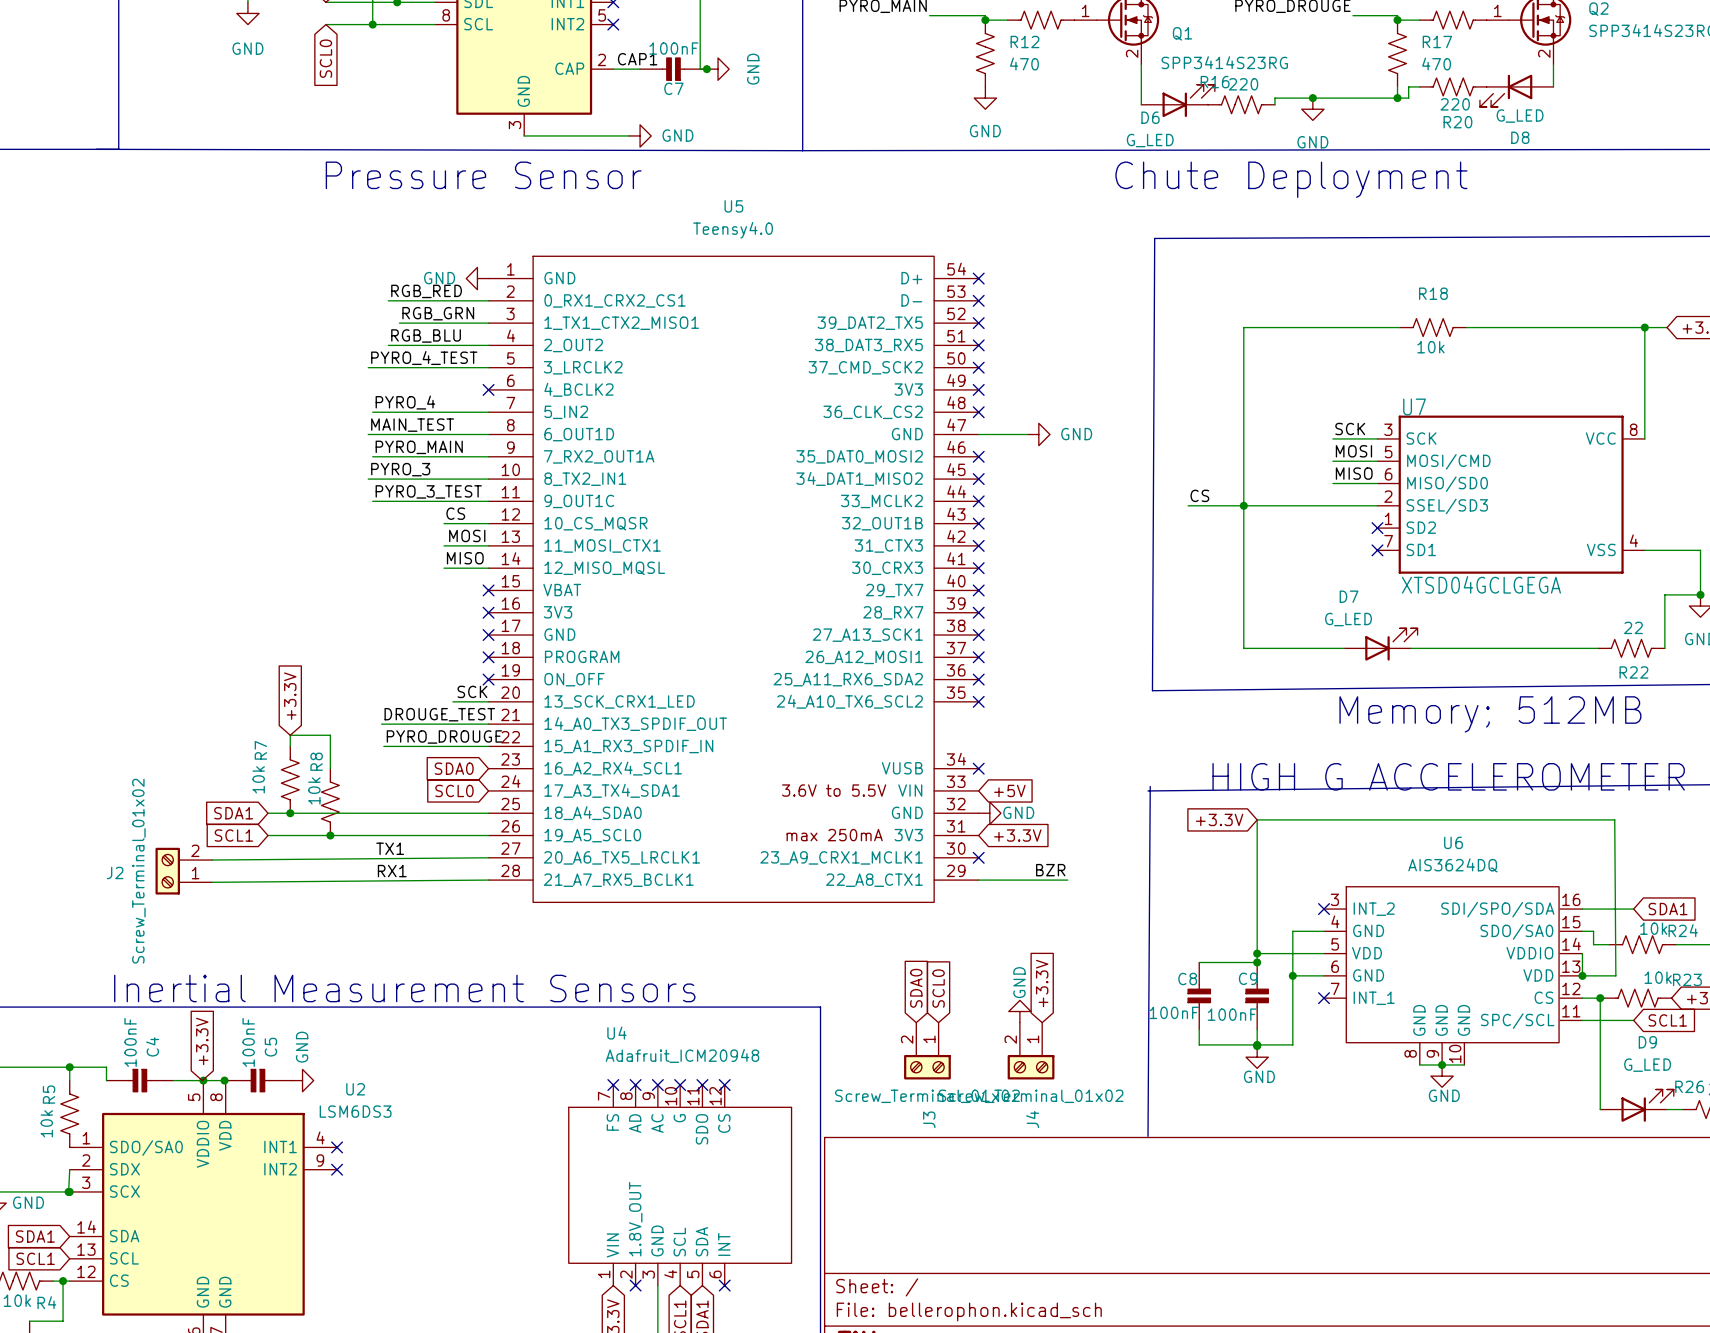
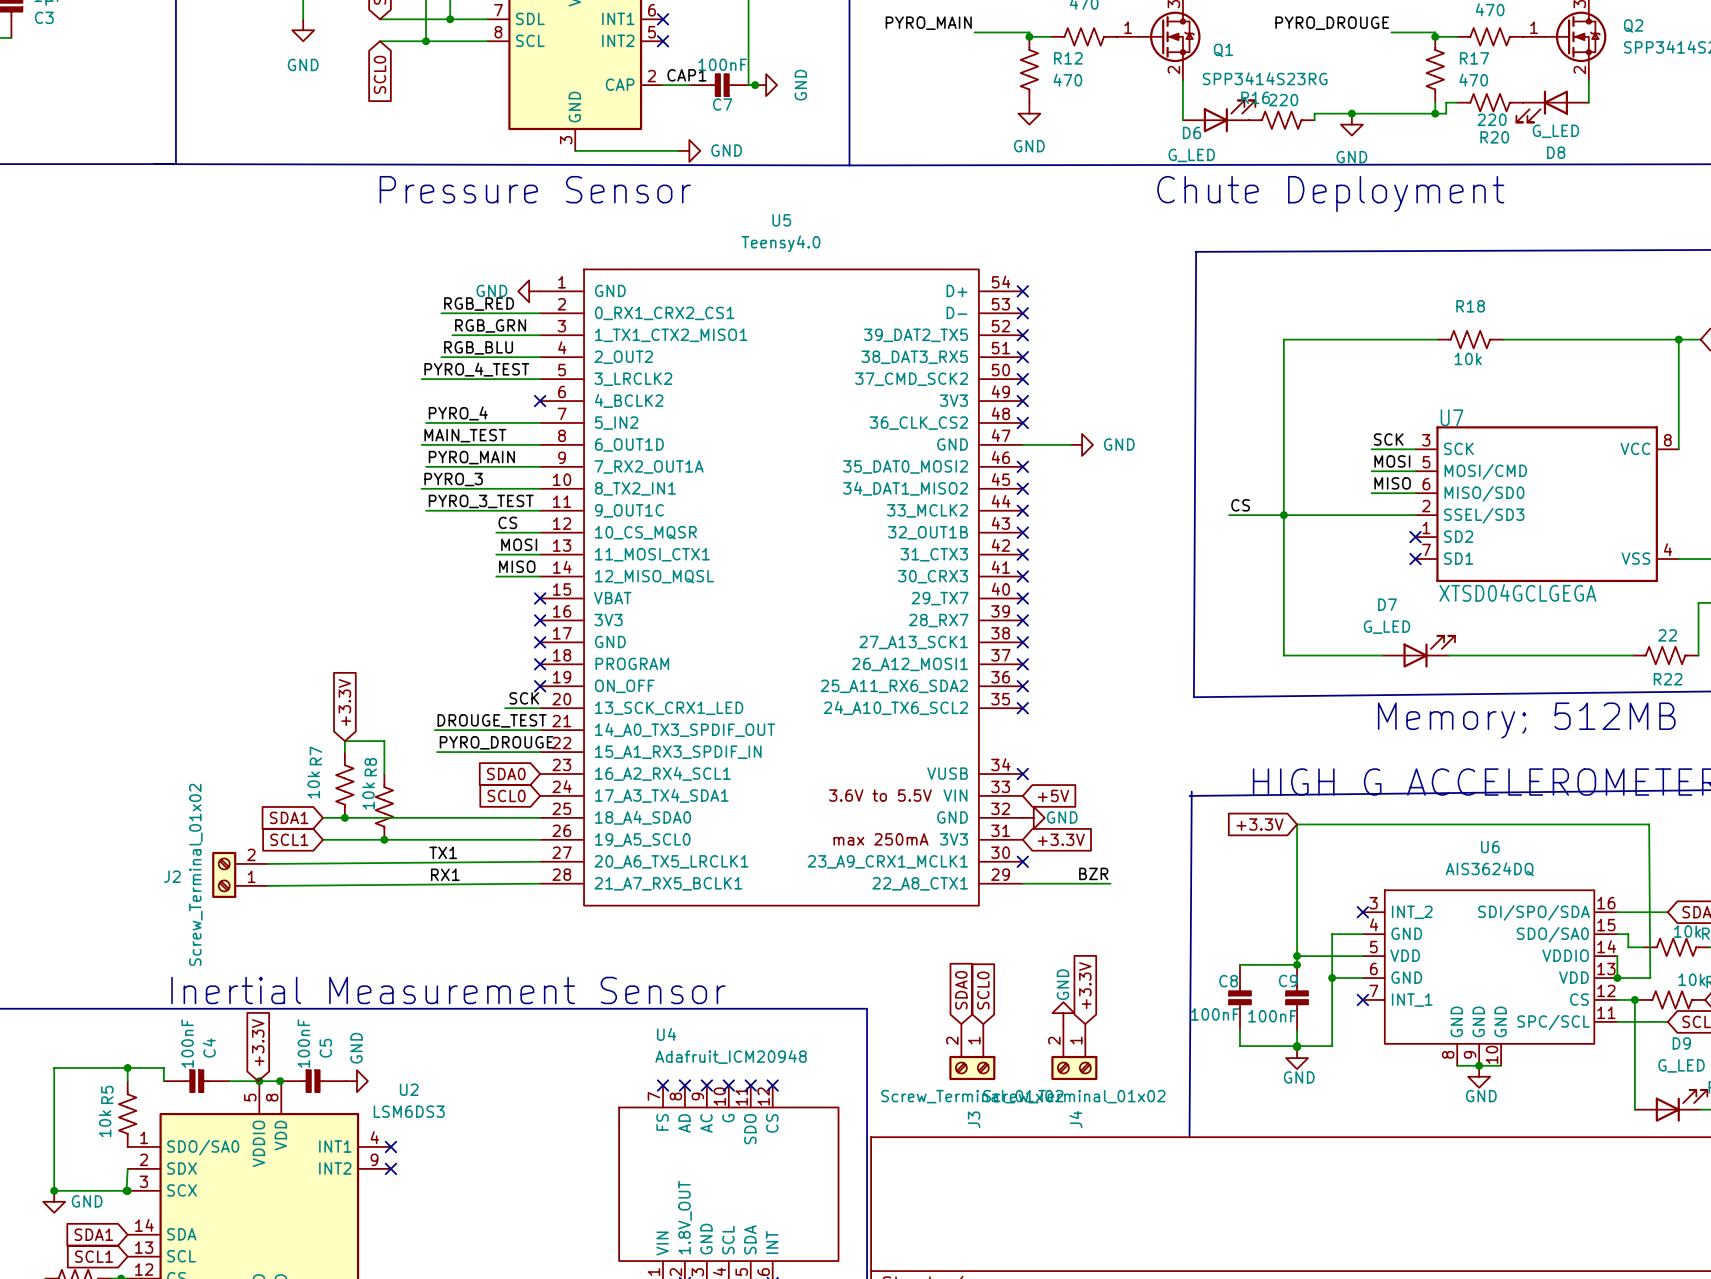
text: Inertial Measurement Sensors (404, 988) -> Inertial Measurement Sensor (448, 990)

